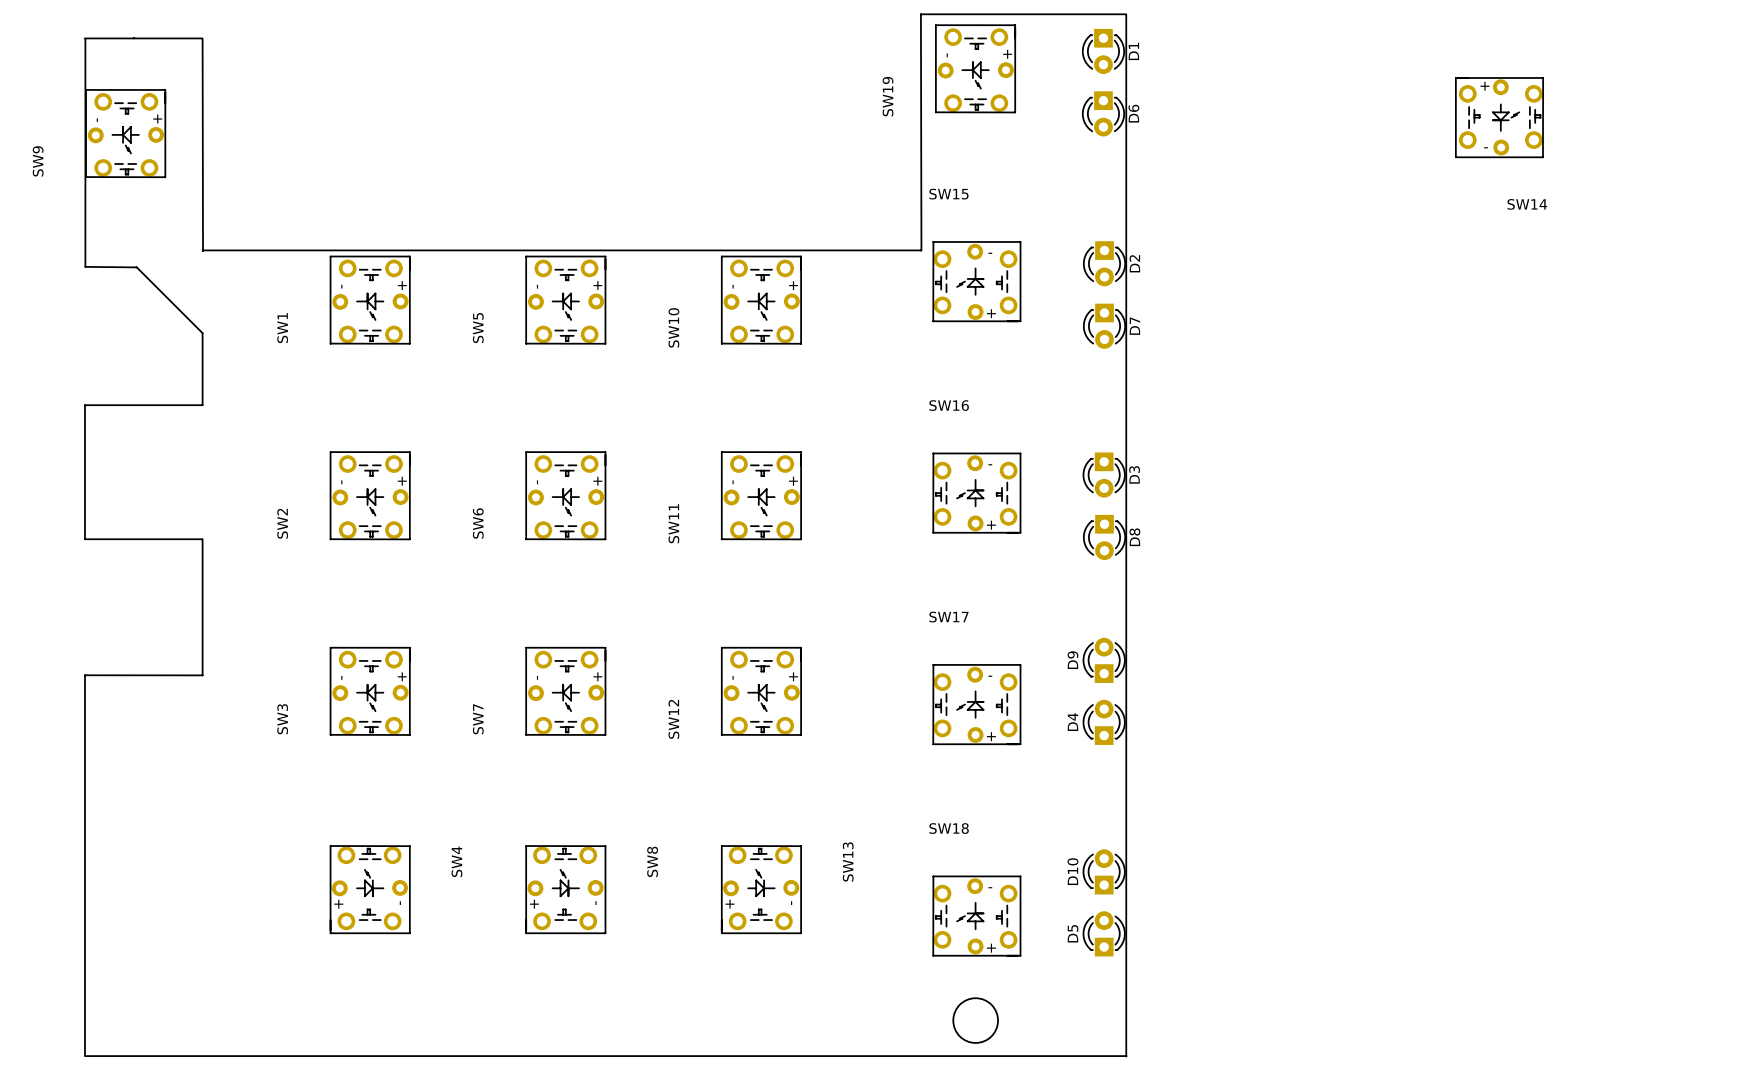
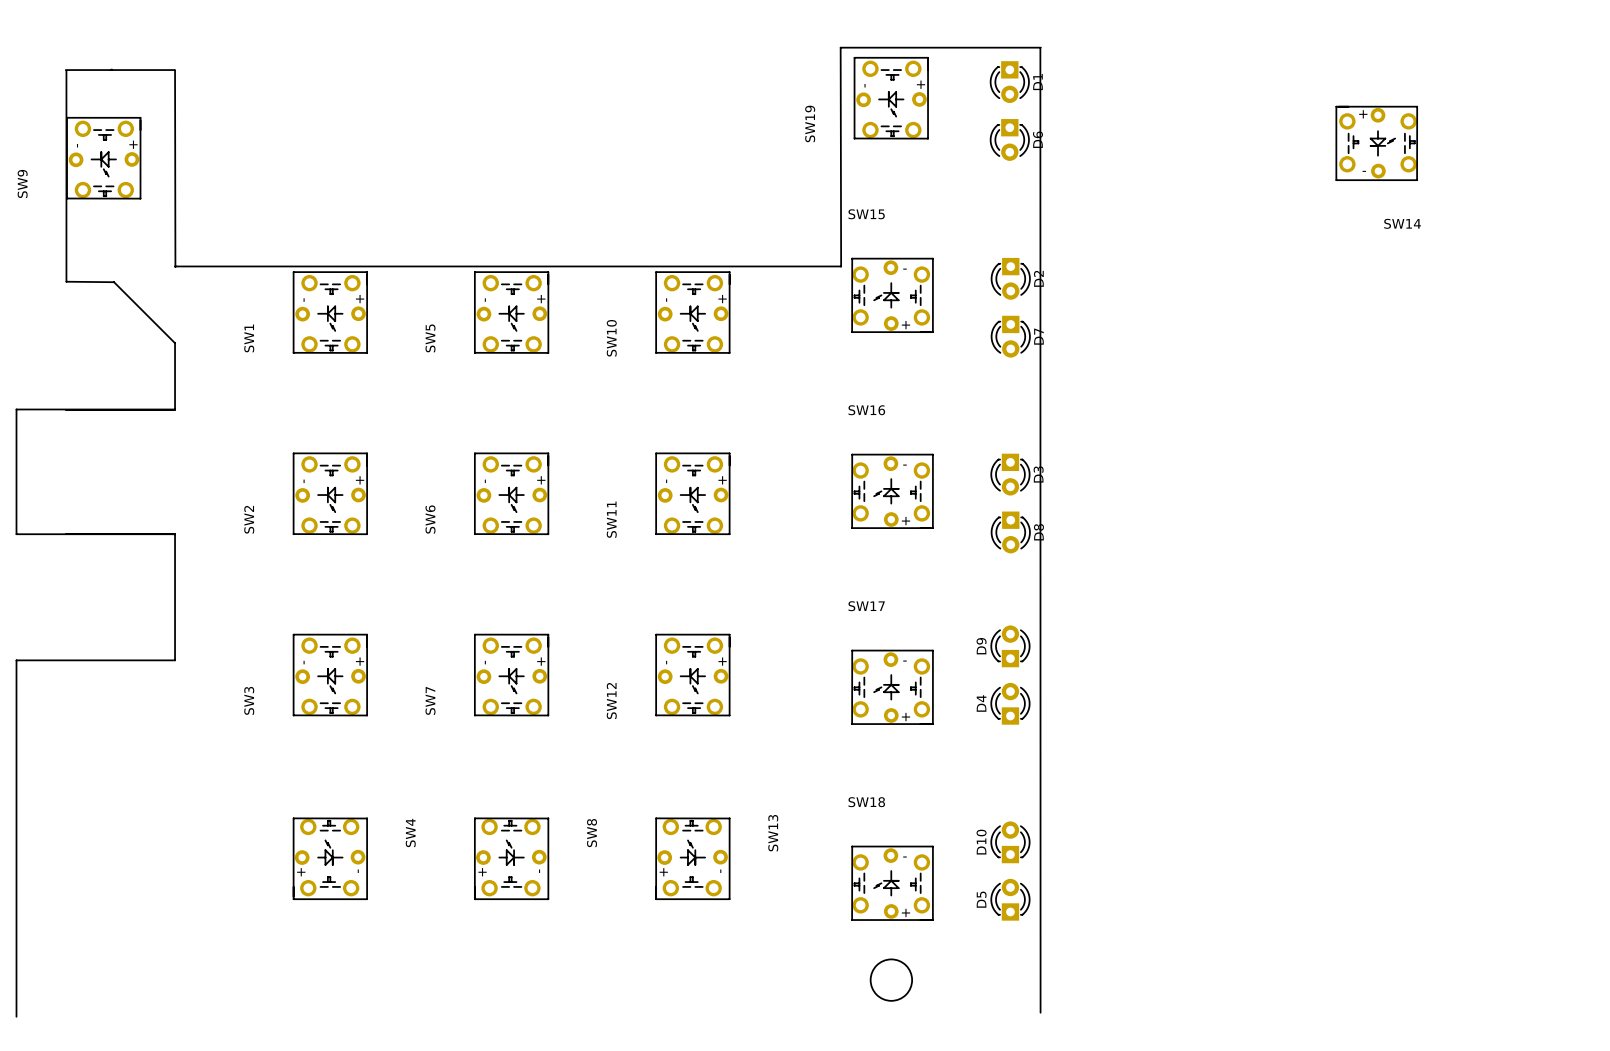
board edge: (1126, 14) (1126, 1056) -> none
board edge: none -> (1030, 47) (1040, 47)
board edge: none -> (1040, 48) (1040, 1012)
board edge: none -> (175, 409) (16, 409) (16, 534) (175, 534)
board edge: (84, 405) (84, 539) -> none
board edge: (84, 674) (84, 1056) -> none
board edge: (85, 675) (202, 675) -> (16, 1016) (16, 660) (175, 660)
board edge: (86, 1056) (1126, 1056) -> none

